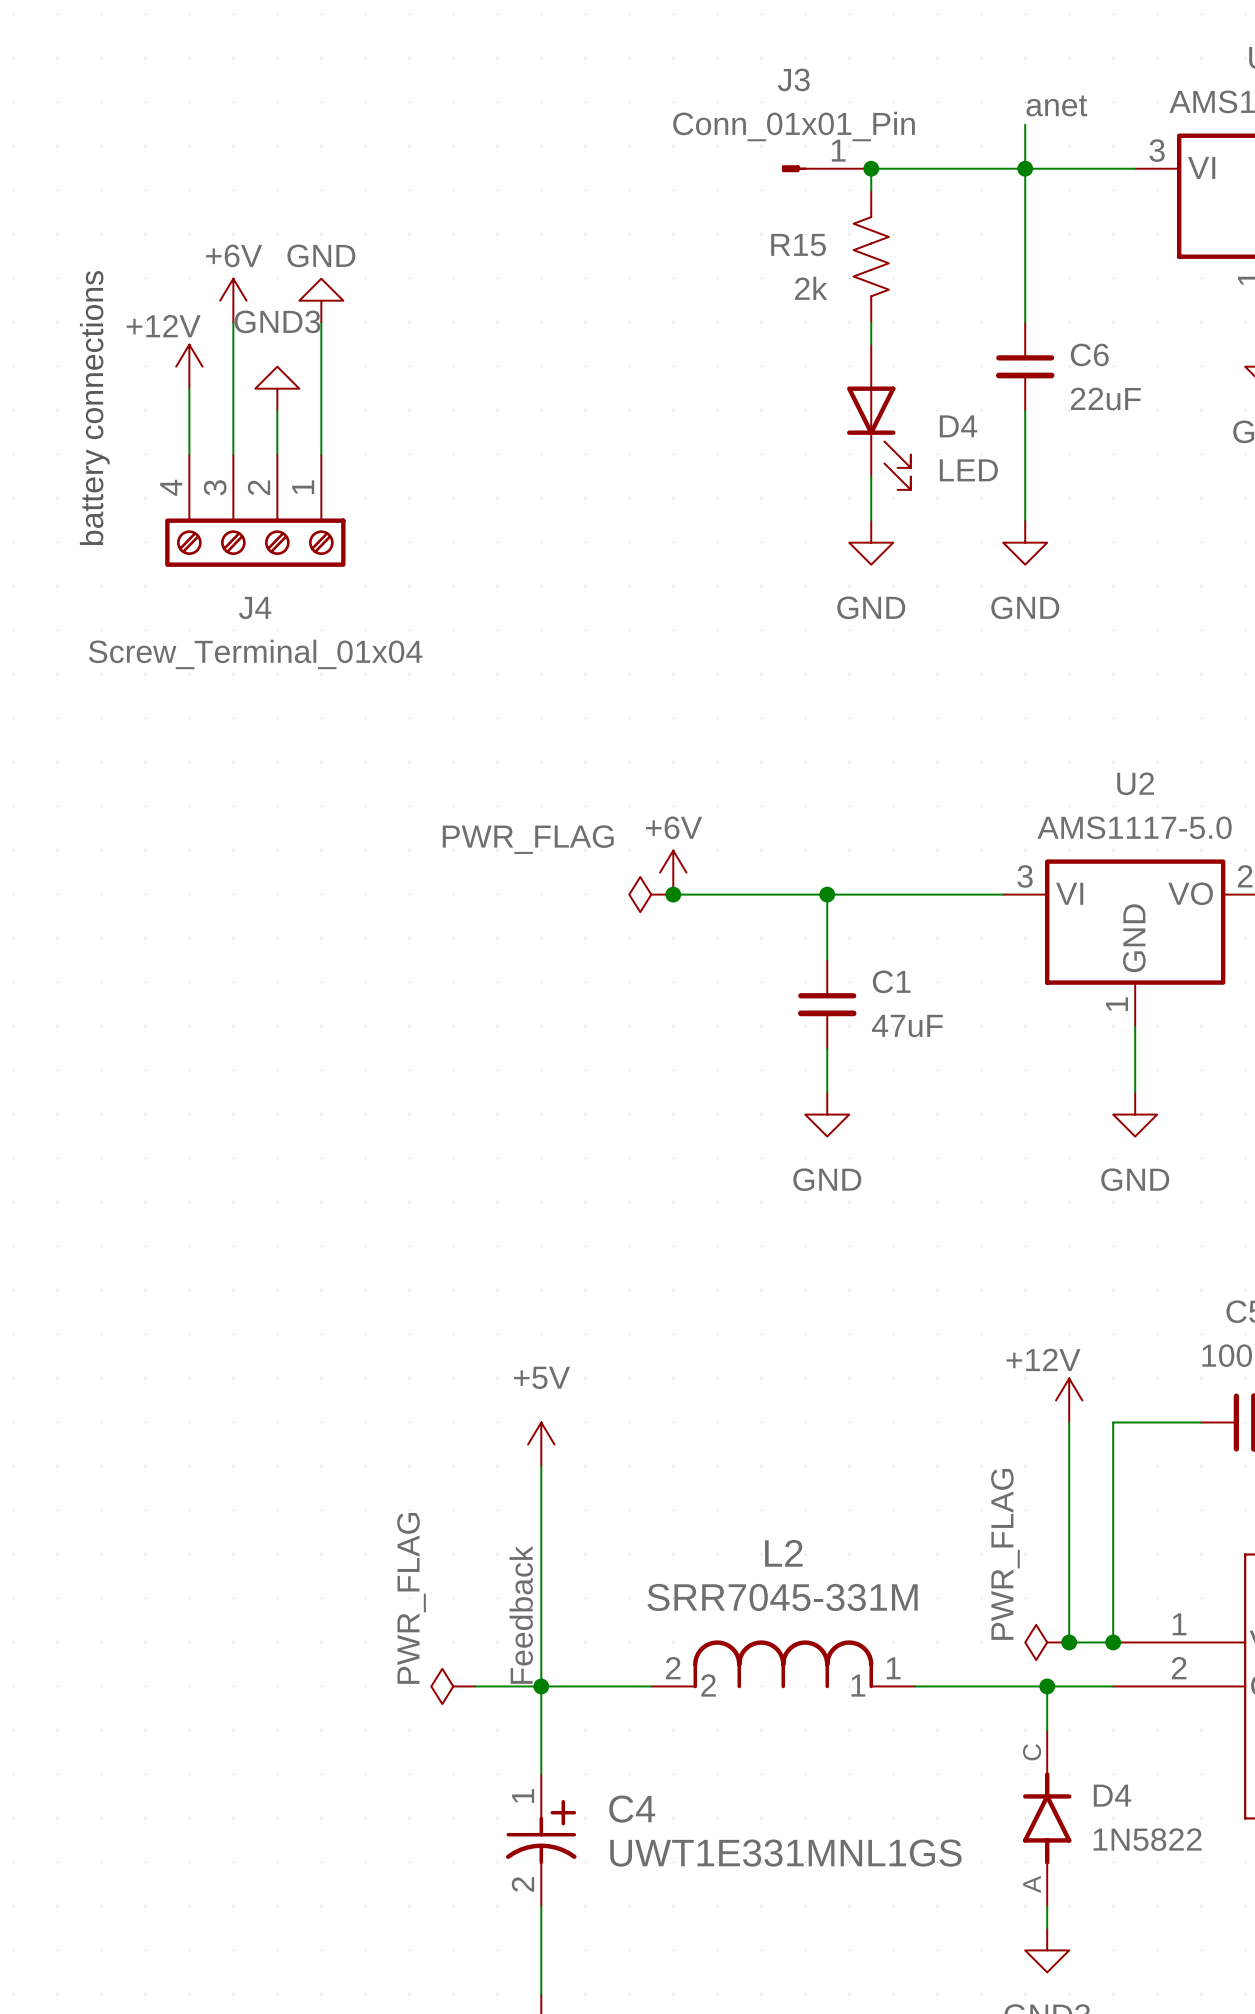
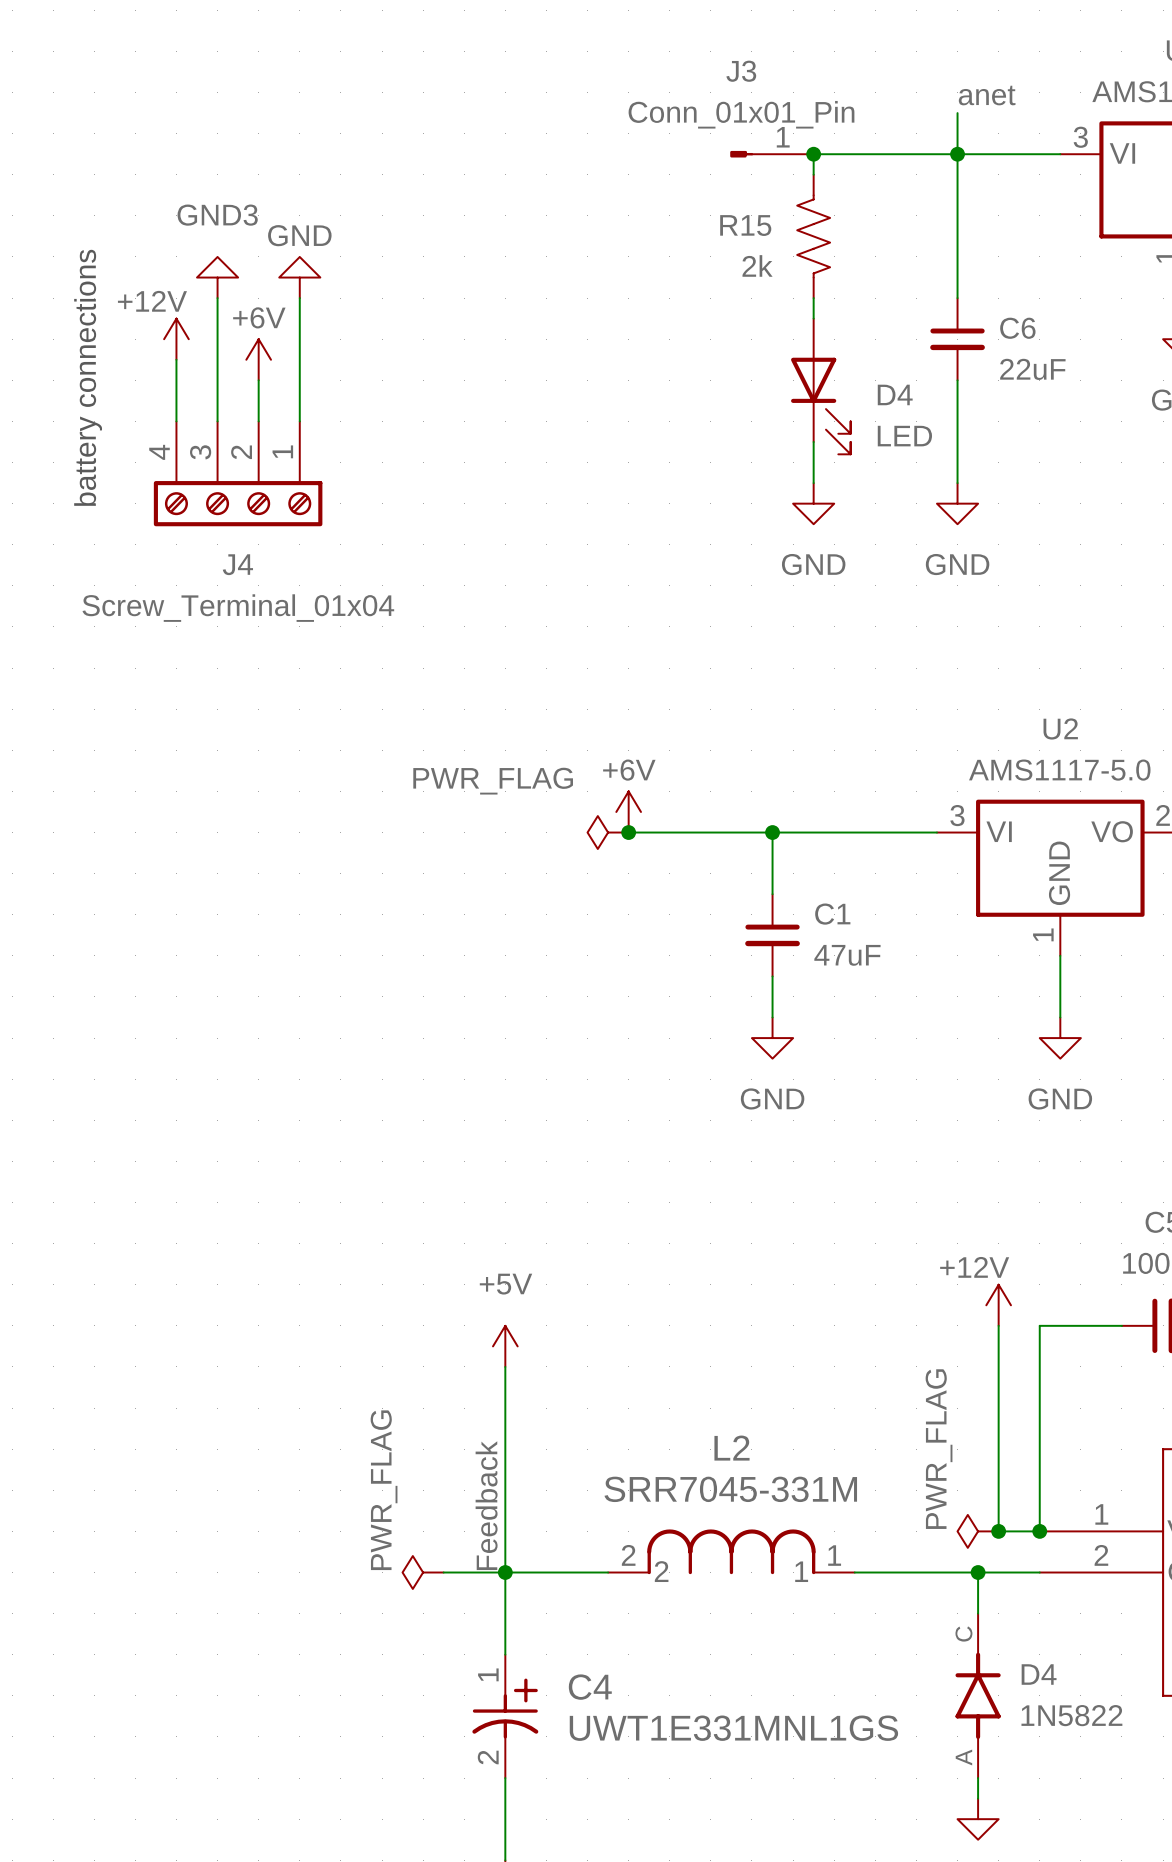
power symbol: +6V (233, 300) -> GND3 (217, 277)
power symbol: GND3 (277, 388) -> +6V (258, 359)

